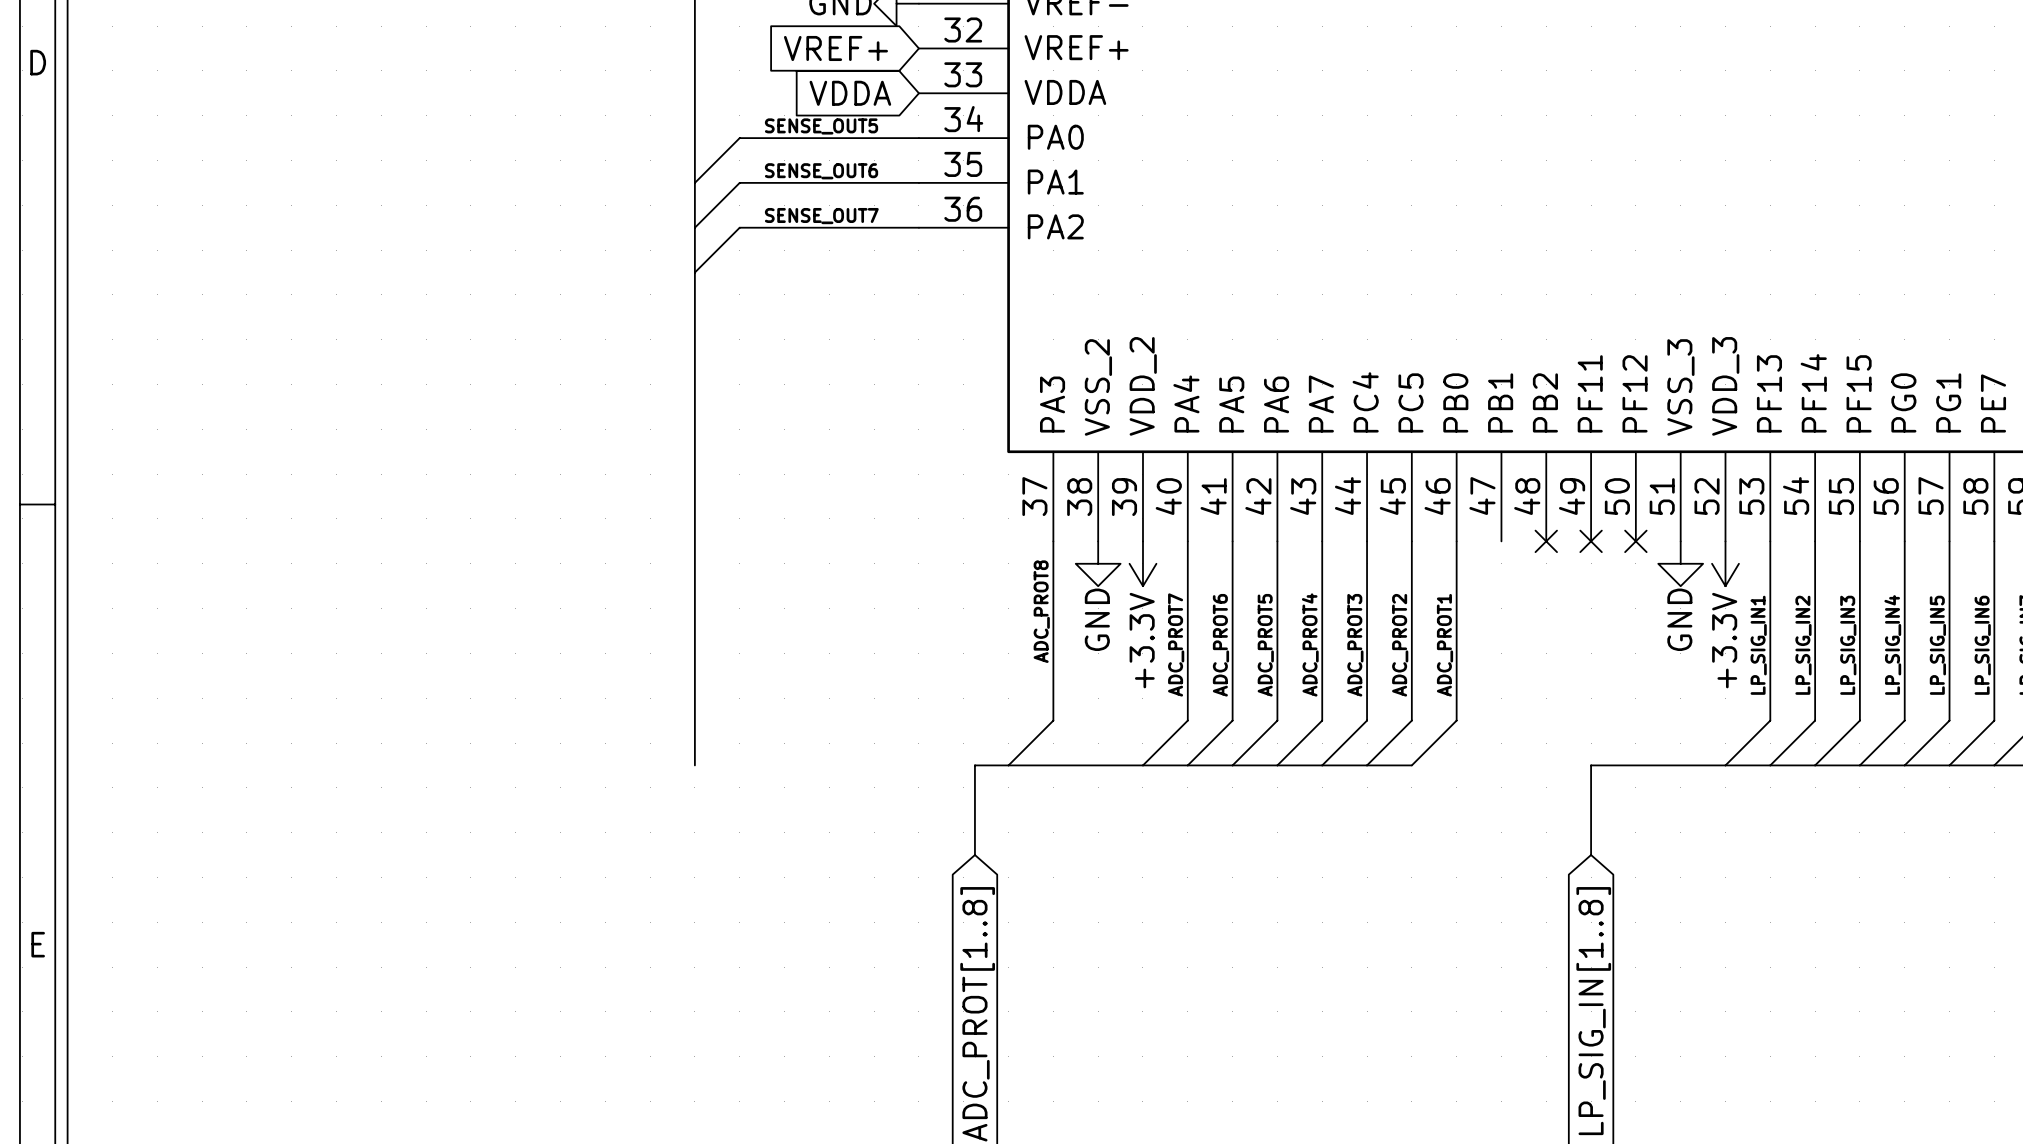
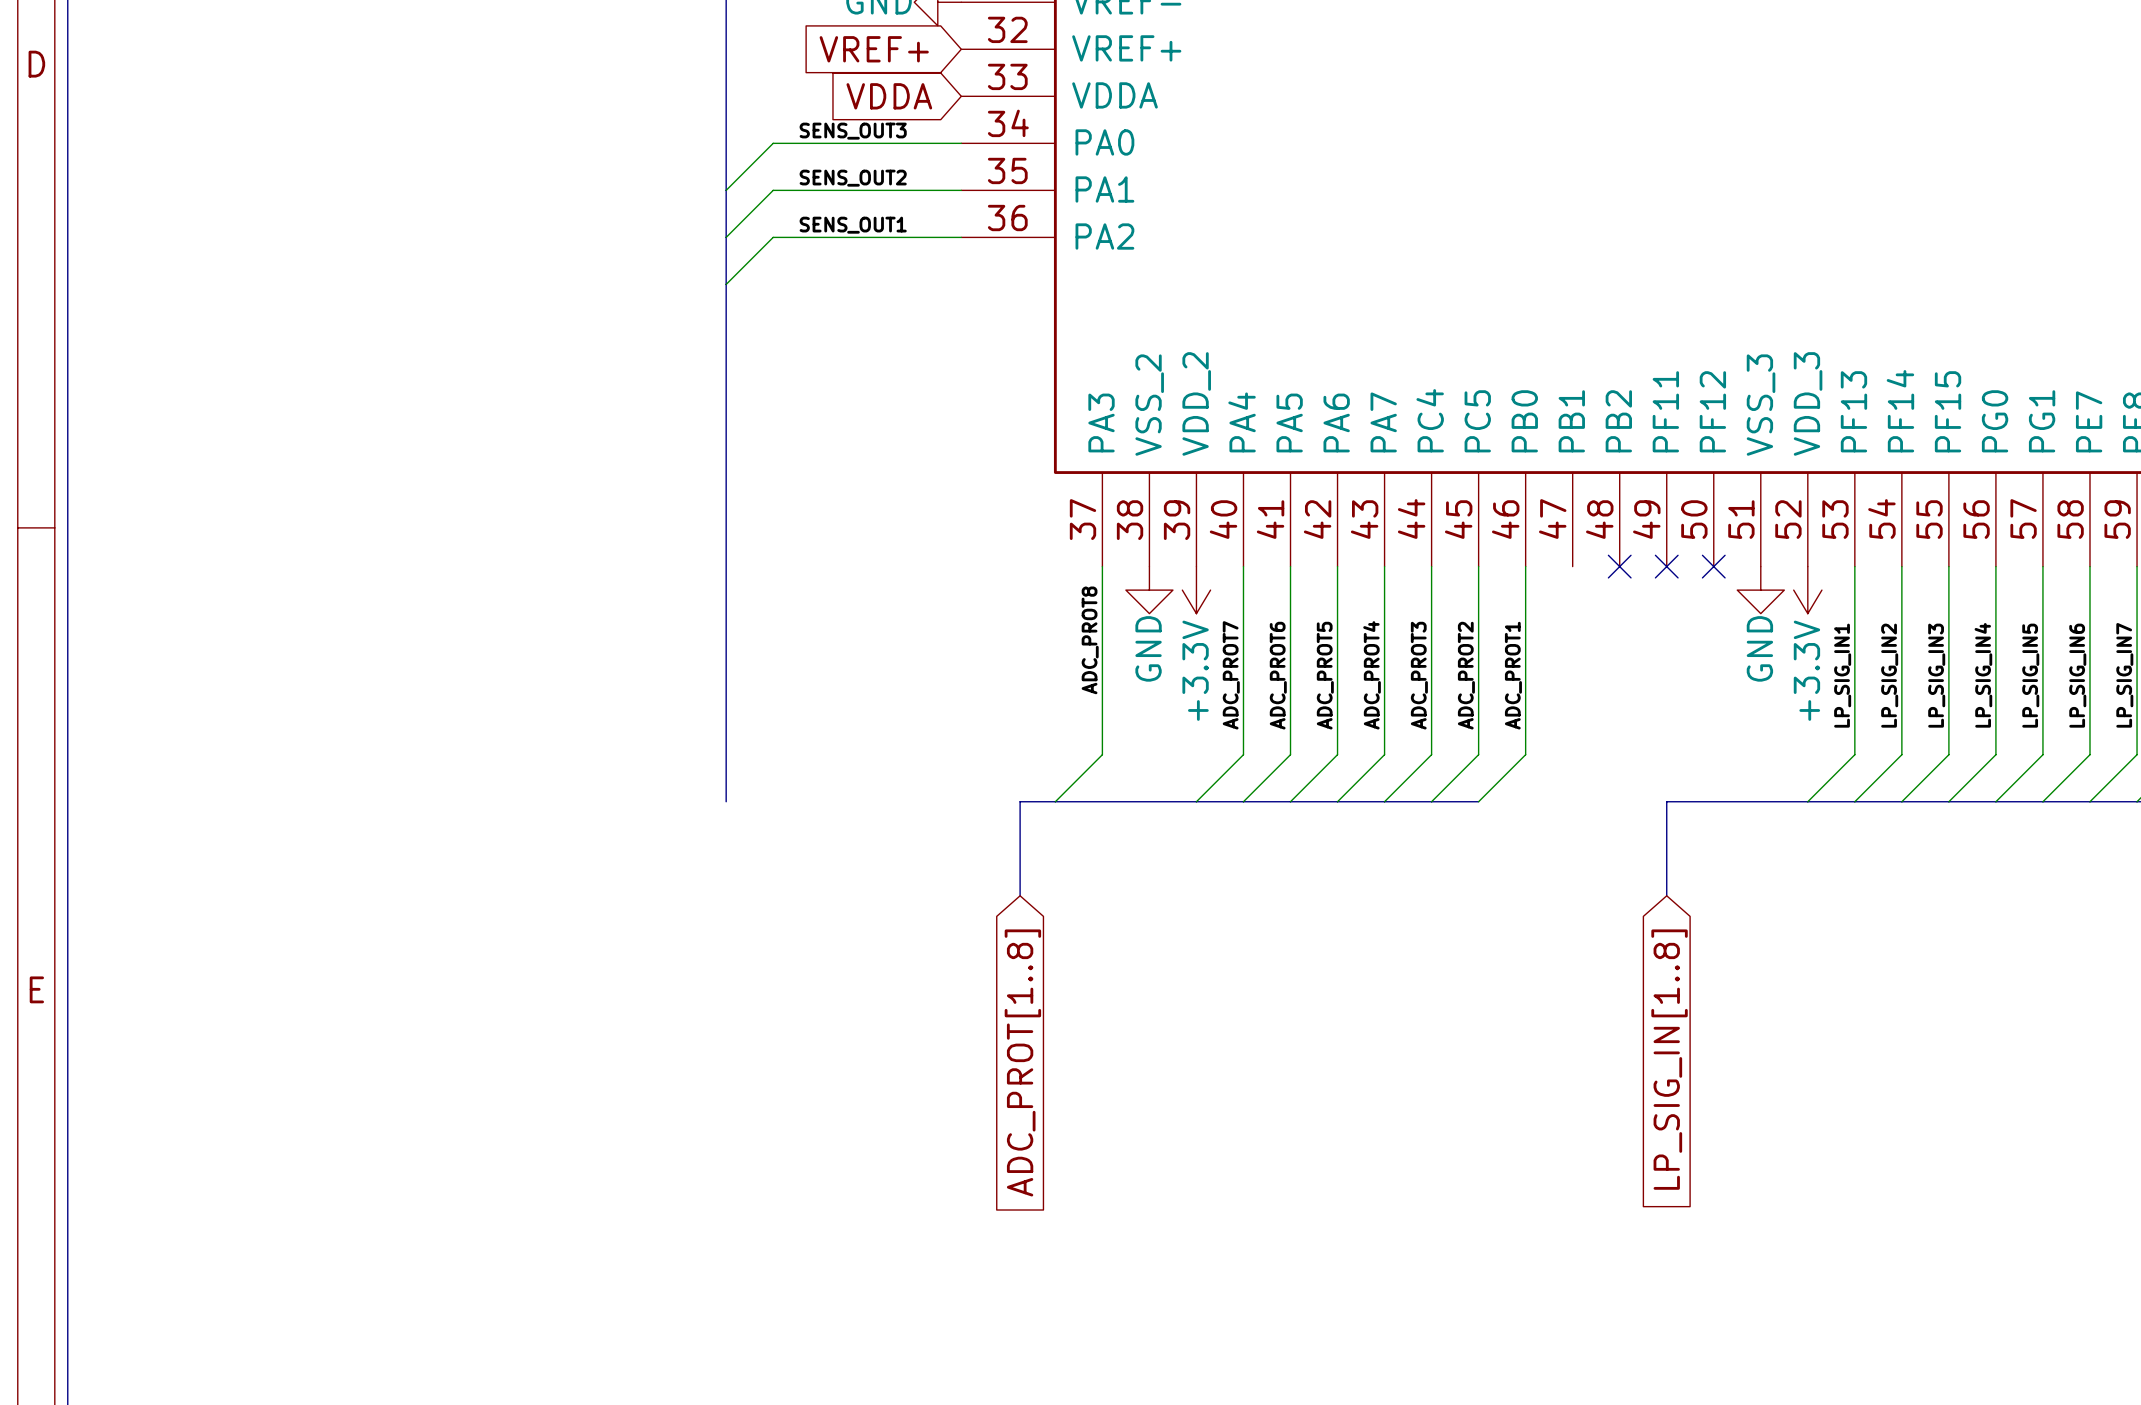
label: SENSE_OUT5 (821, 126) -> SENS_OUT3 (853, 131)
label: SENSE_OUT6 (821, 171) -> SENS_OUT2 (853, 178)
label: SENSE_OUT7 (821, 216) -> SENS_OUT1 (853, 225)

